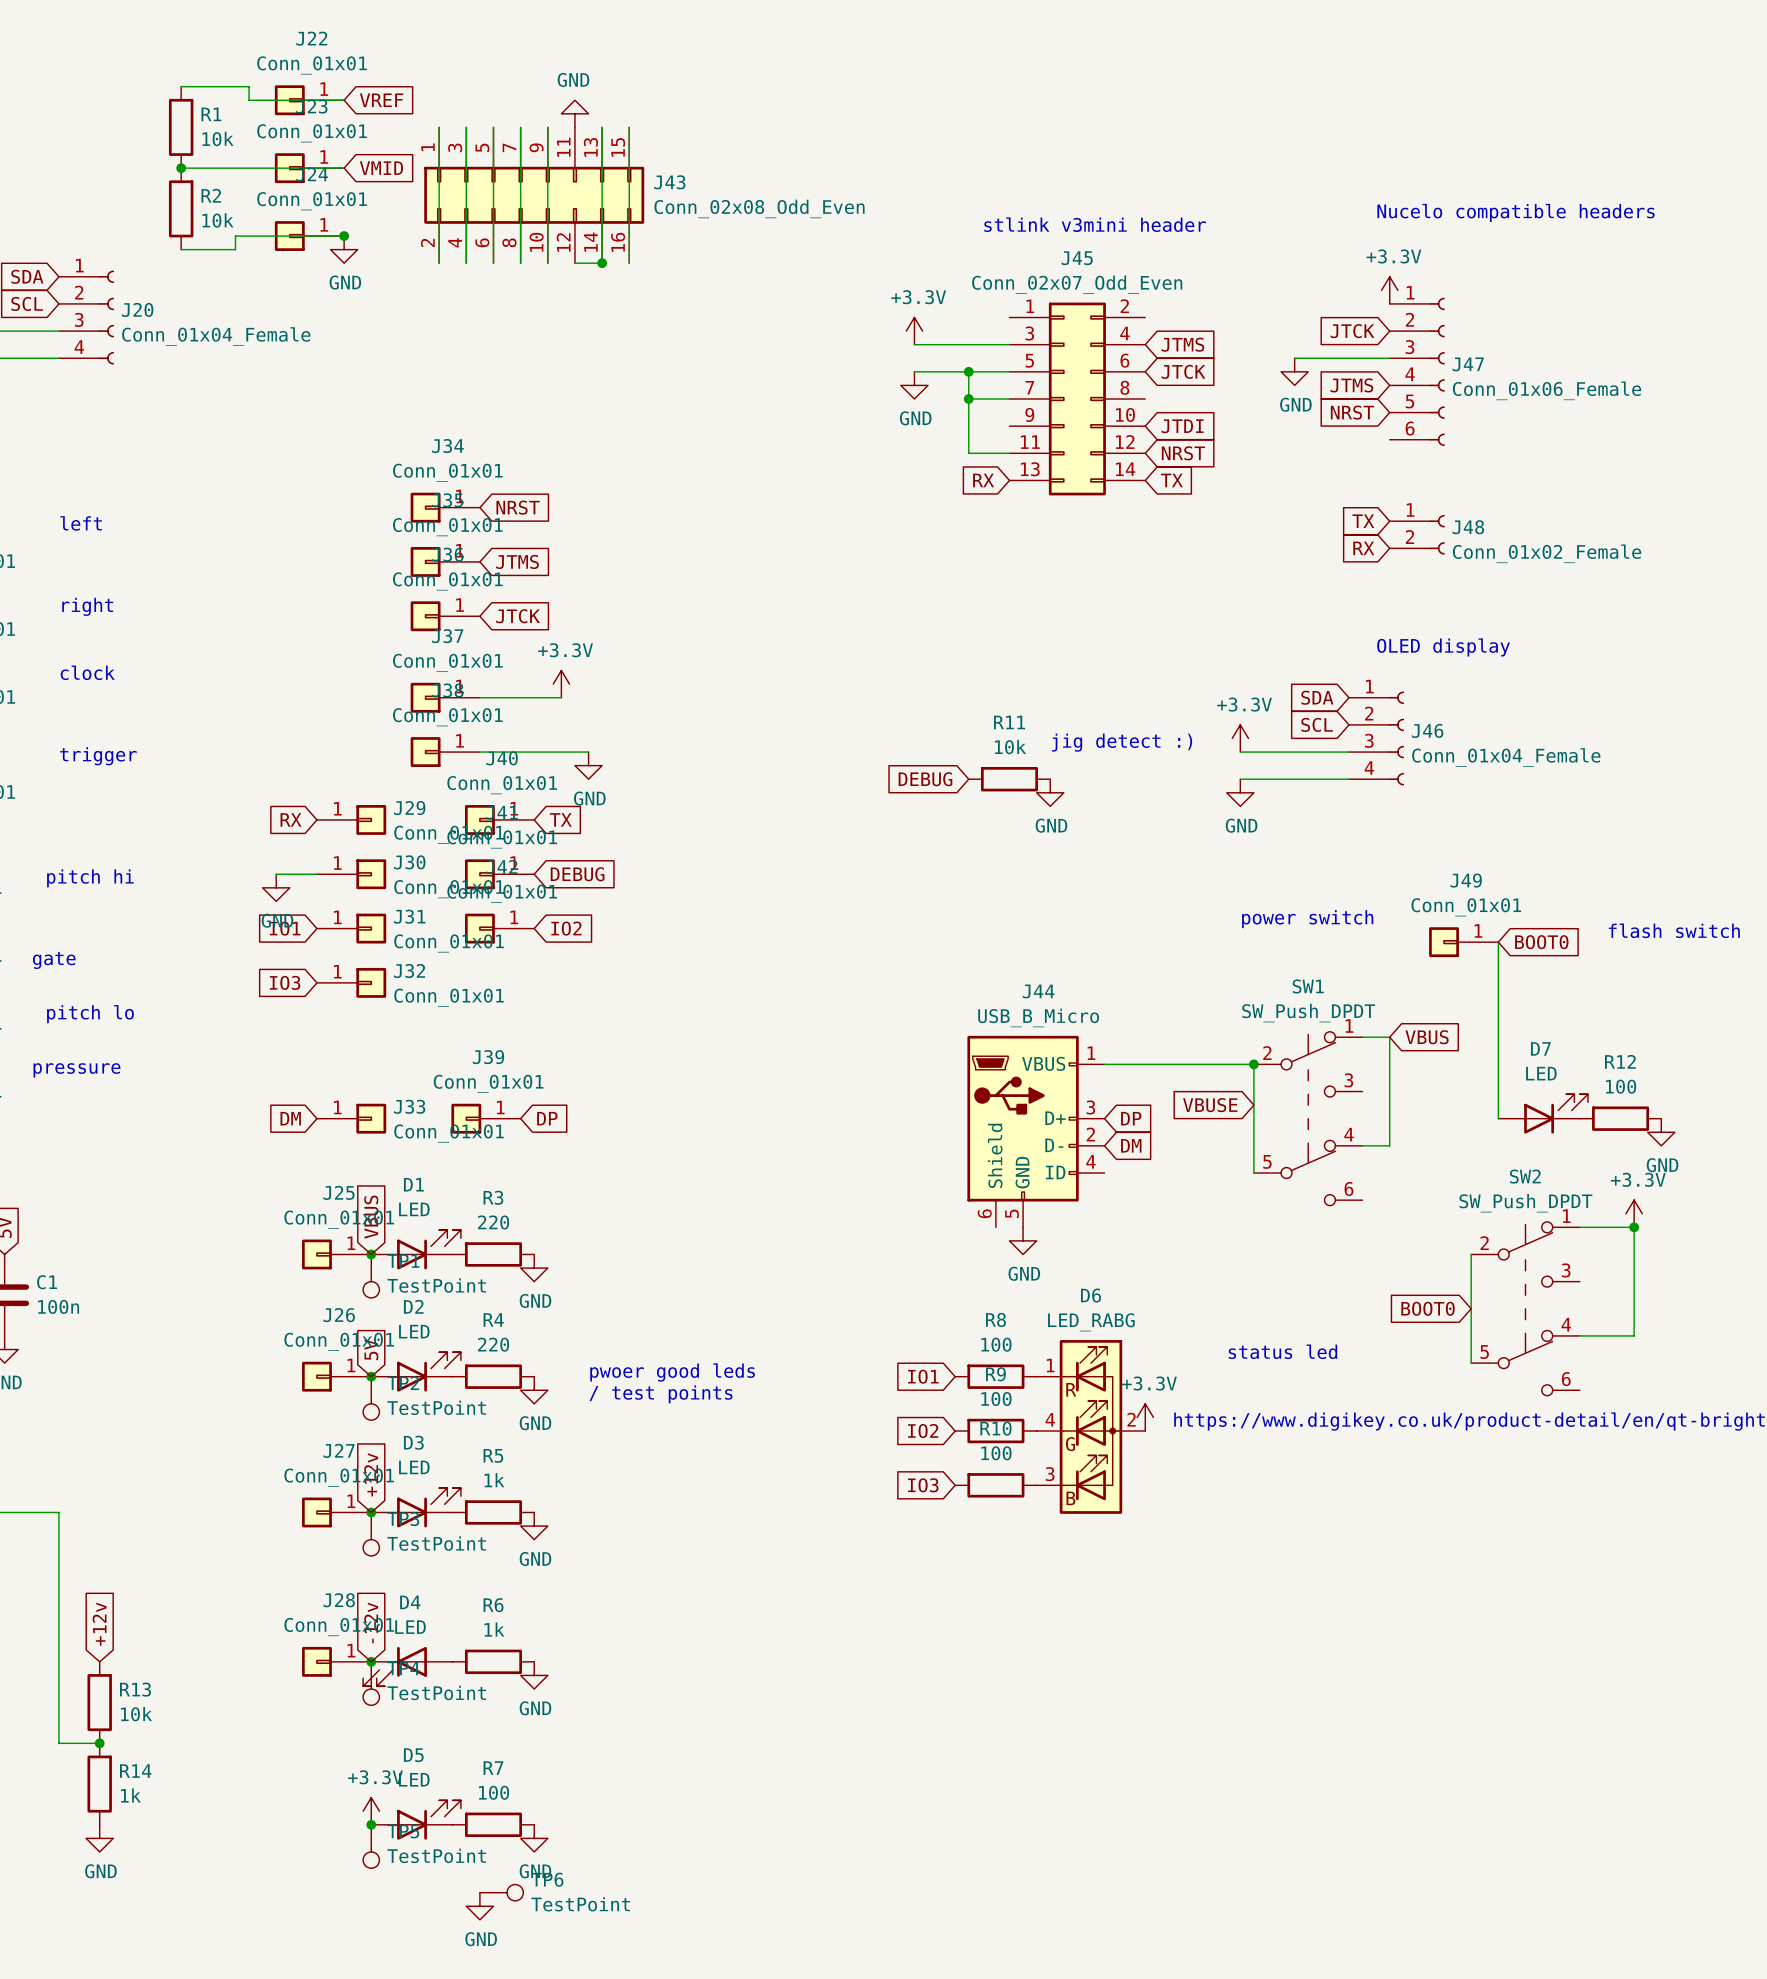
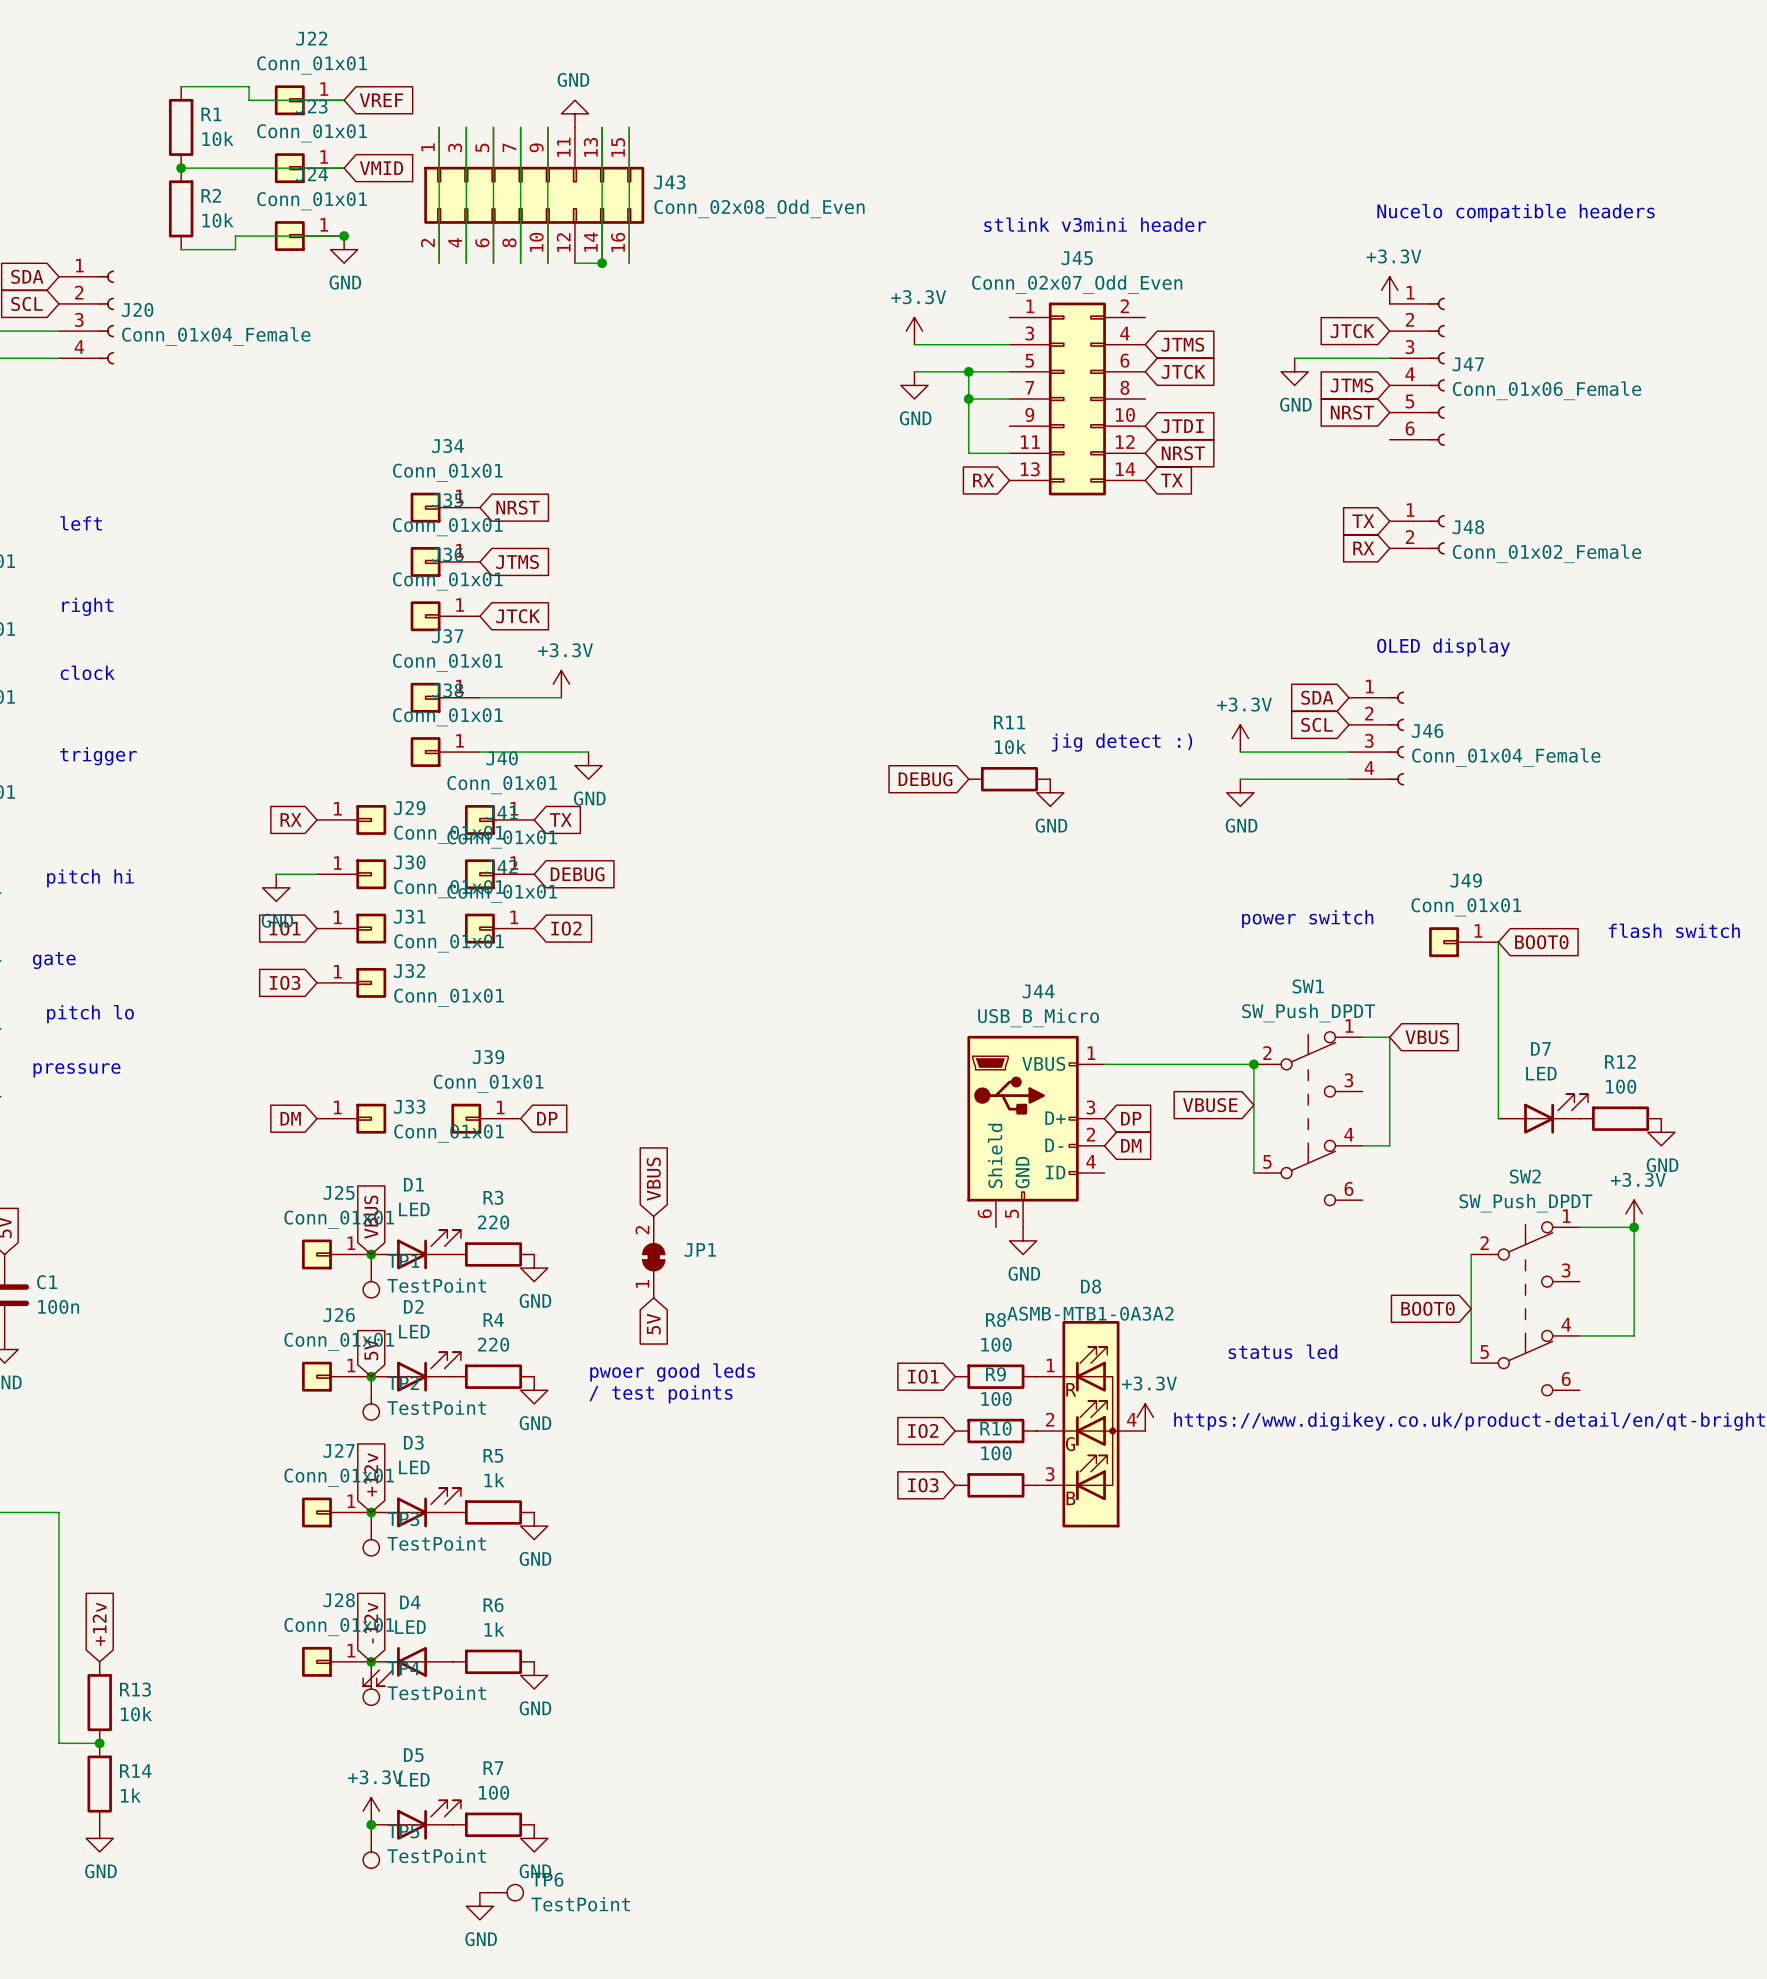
global label: none -> VBUS (653, 1179)
JP1: none -> (653, 1257)
global label: none -> 5V (653, 1324)
D8: none -> ASMB-MTB1-0A3A2 (1090, 1424)
D6: LED_RABG (1090, 1426) -> none

